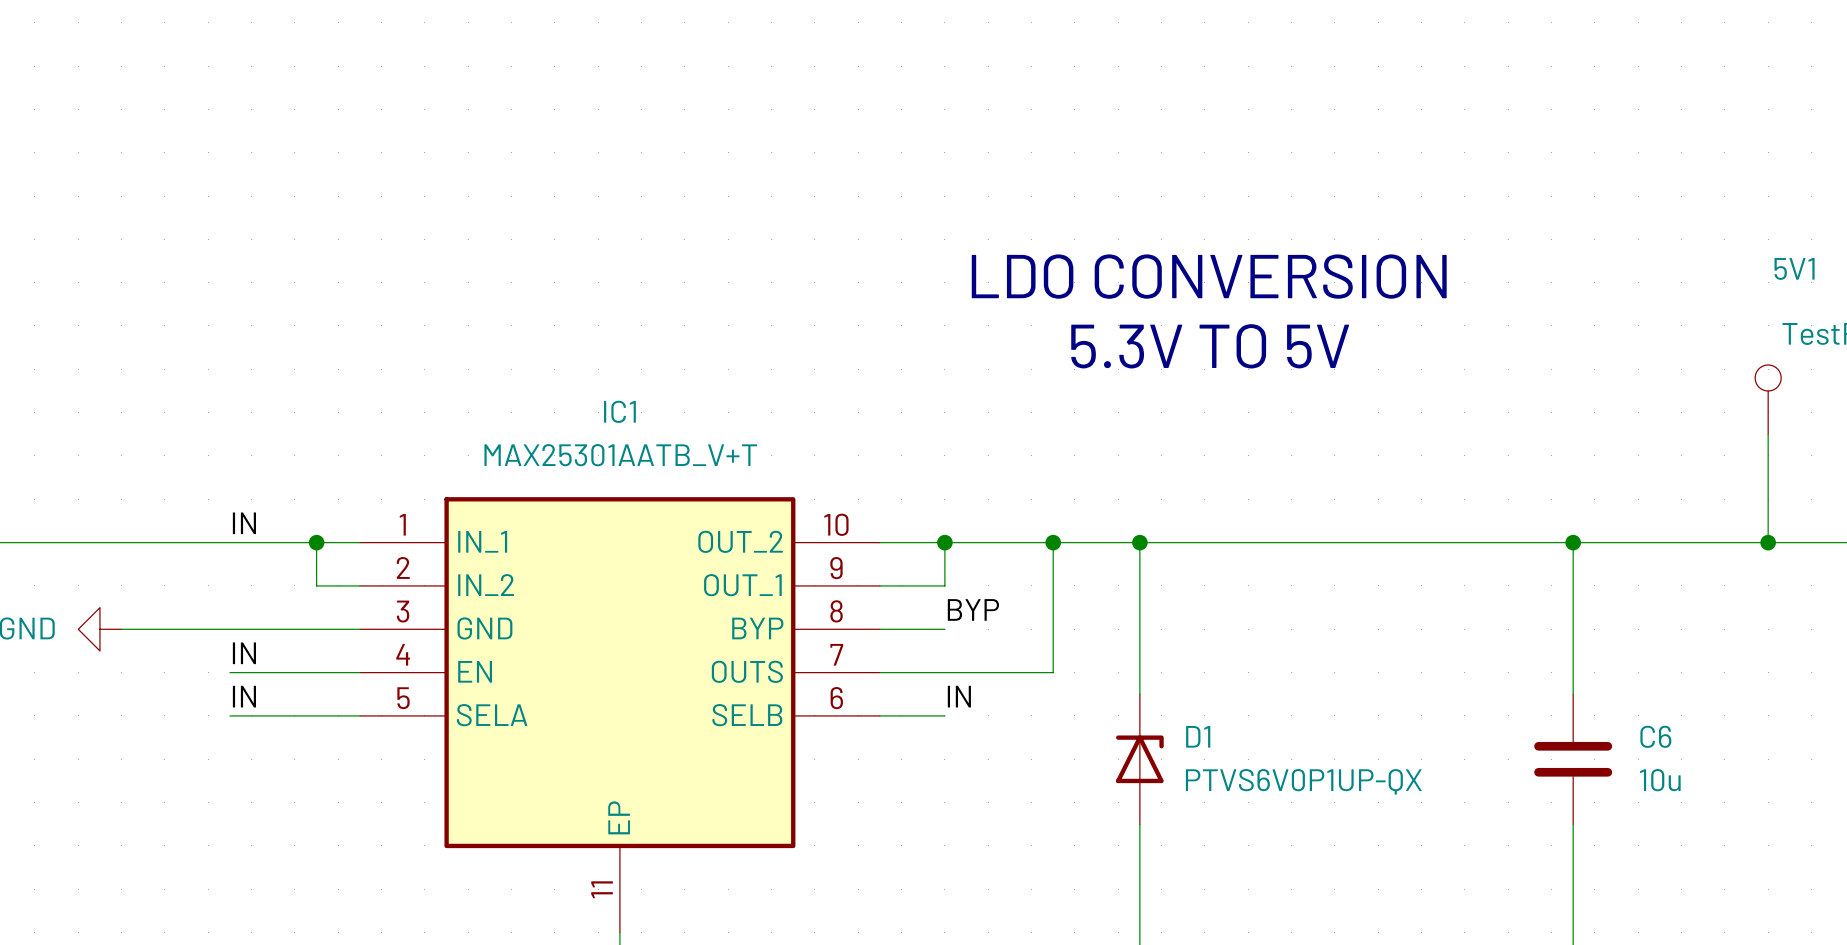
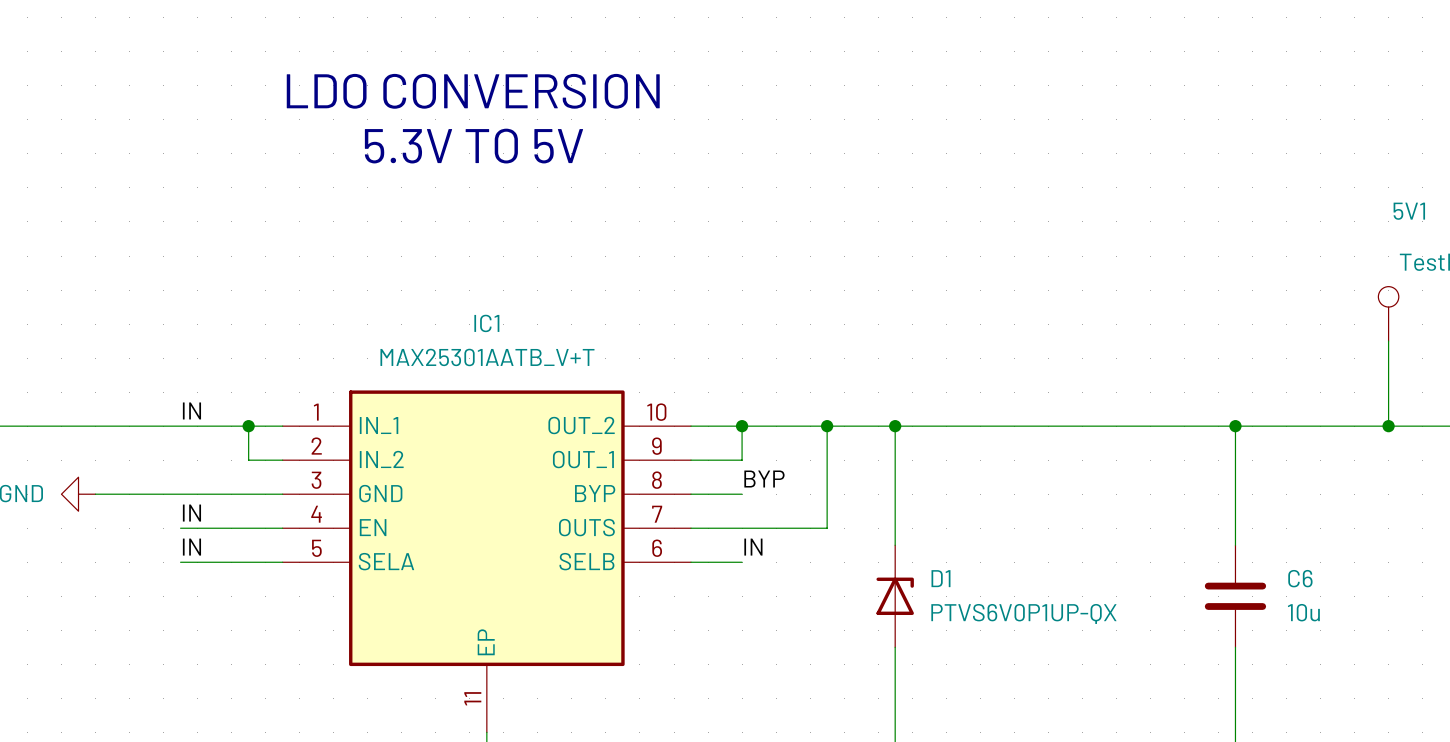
text: none -> LDO CONVERSION (473, 91)
text: none -> 5.3V TO 5V (474, 146)
text: LDO CONVERSION (1209, 276) -> none
text: 5.3V TO 5V (1210, 346) -> none

